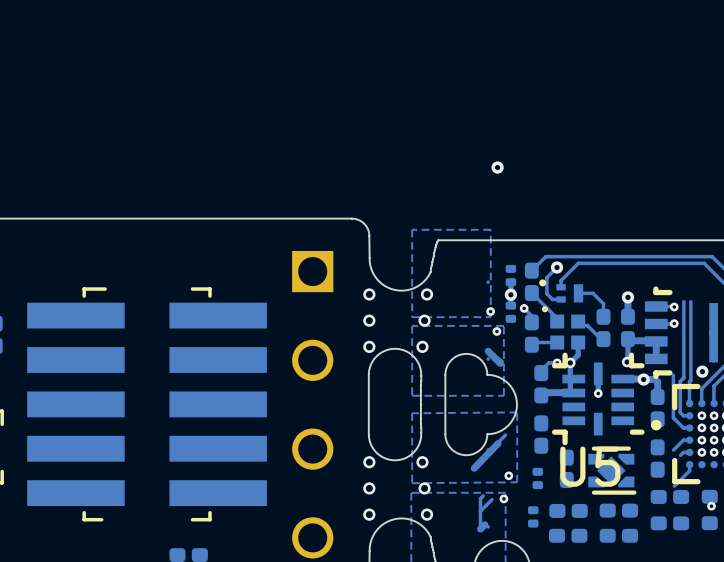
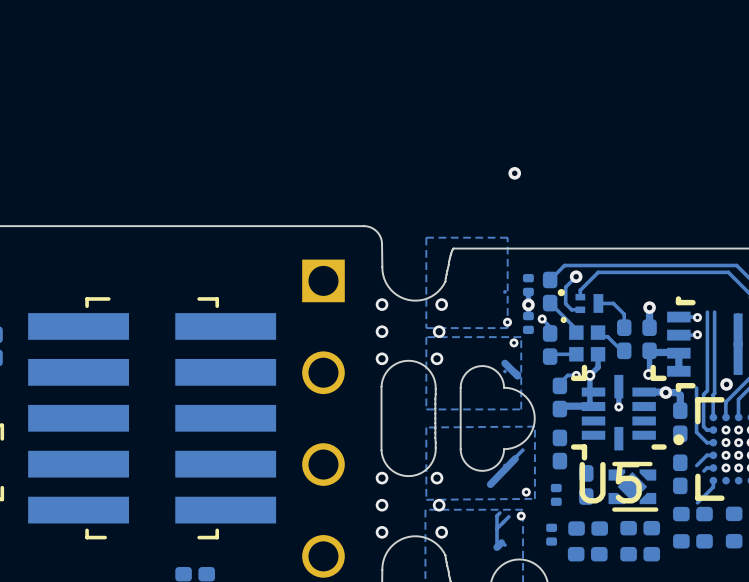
via: (711, 506) -> none

